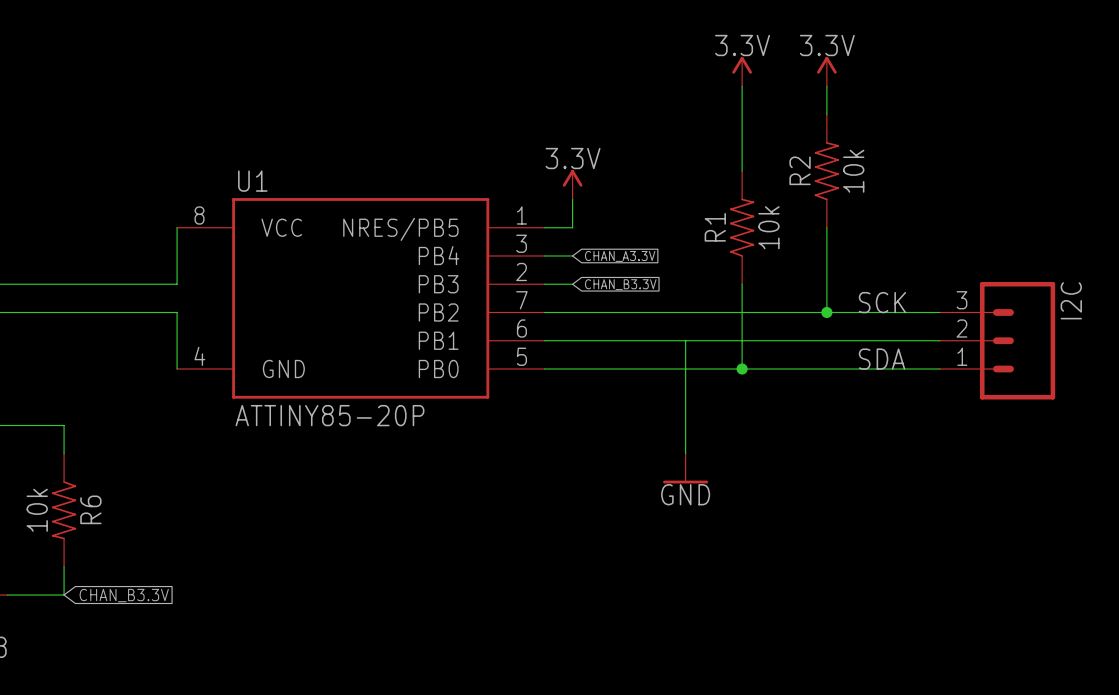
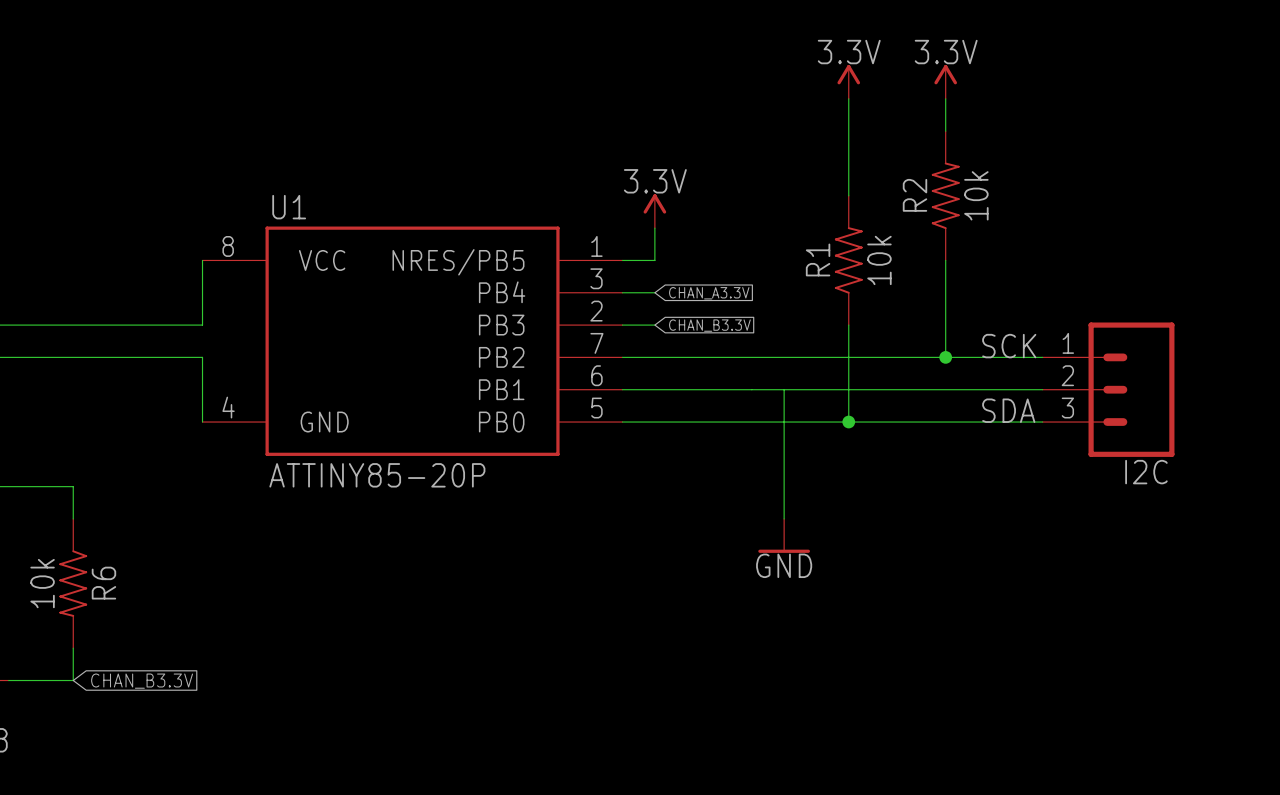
I2C name position: I2C (1071, 300) -> I2C (1146, 472)
I2C flip: as is (1017, 340) -> up-down (1131, 389)

